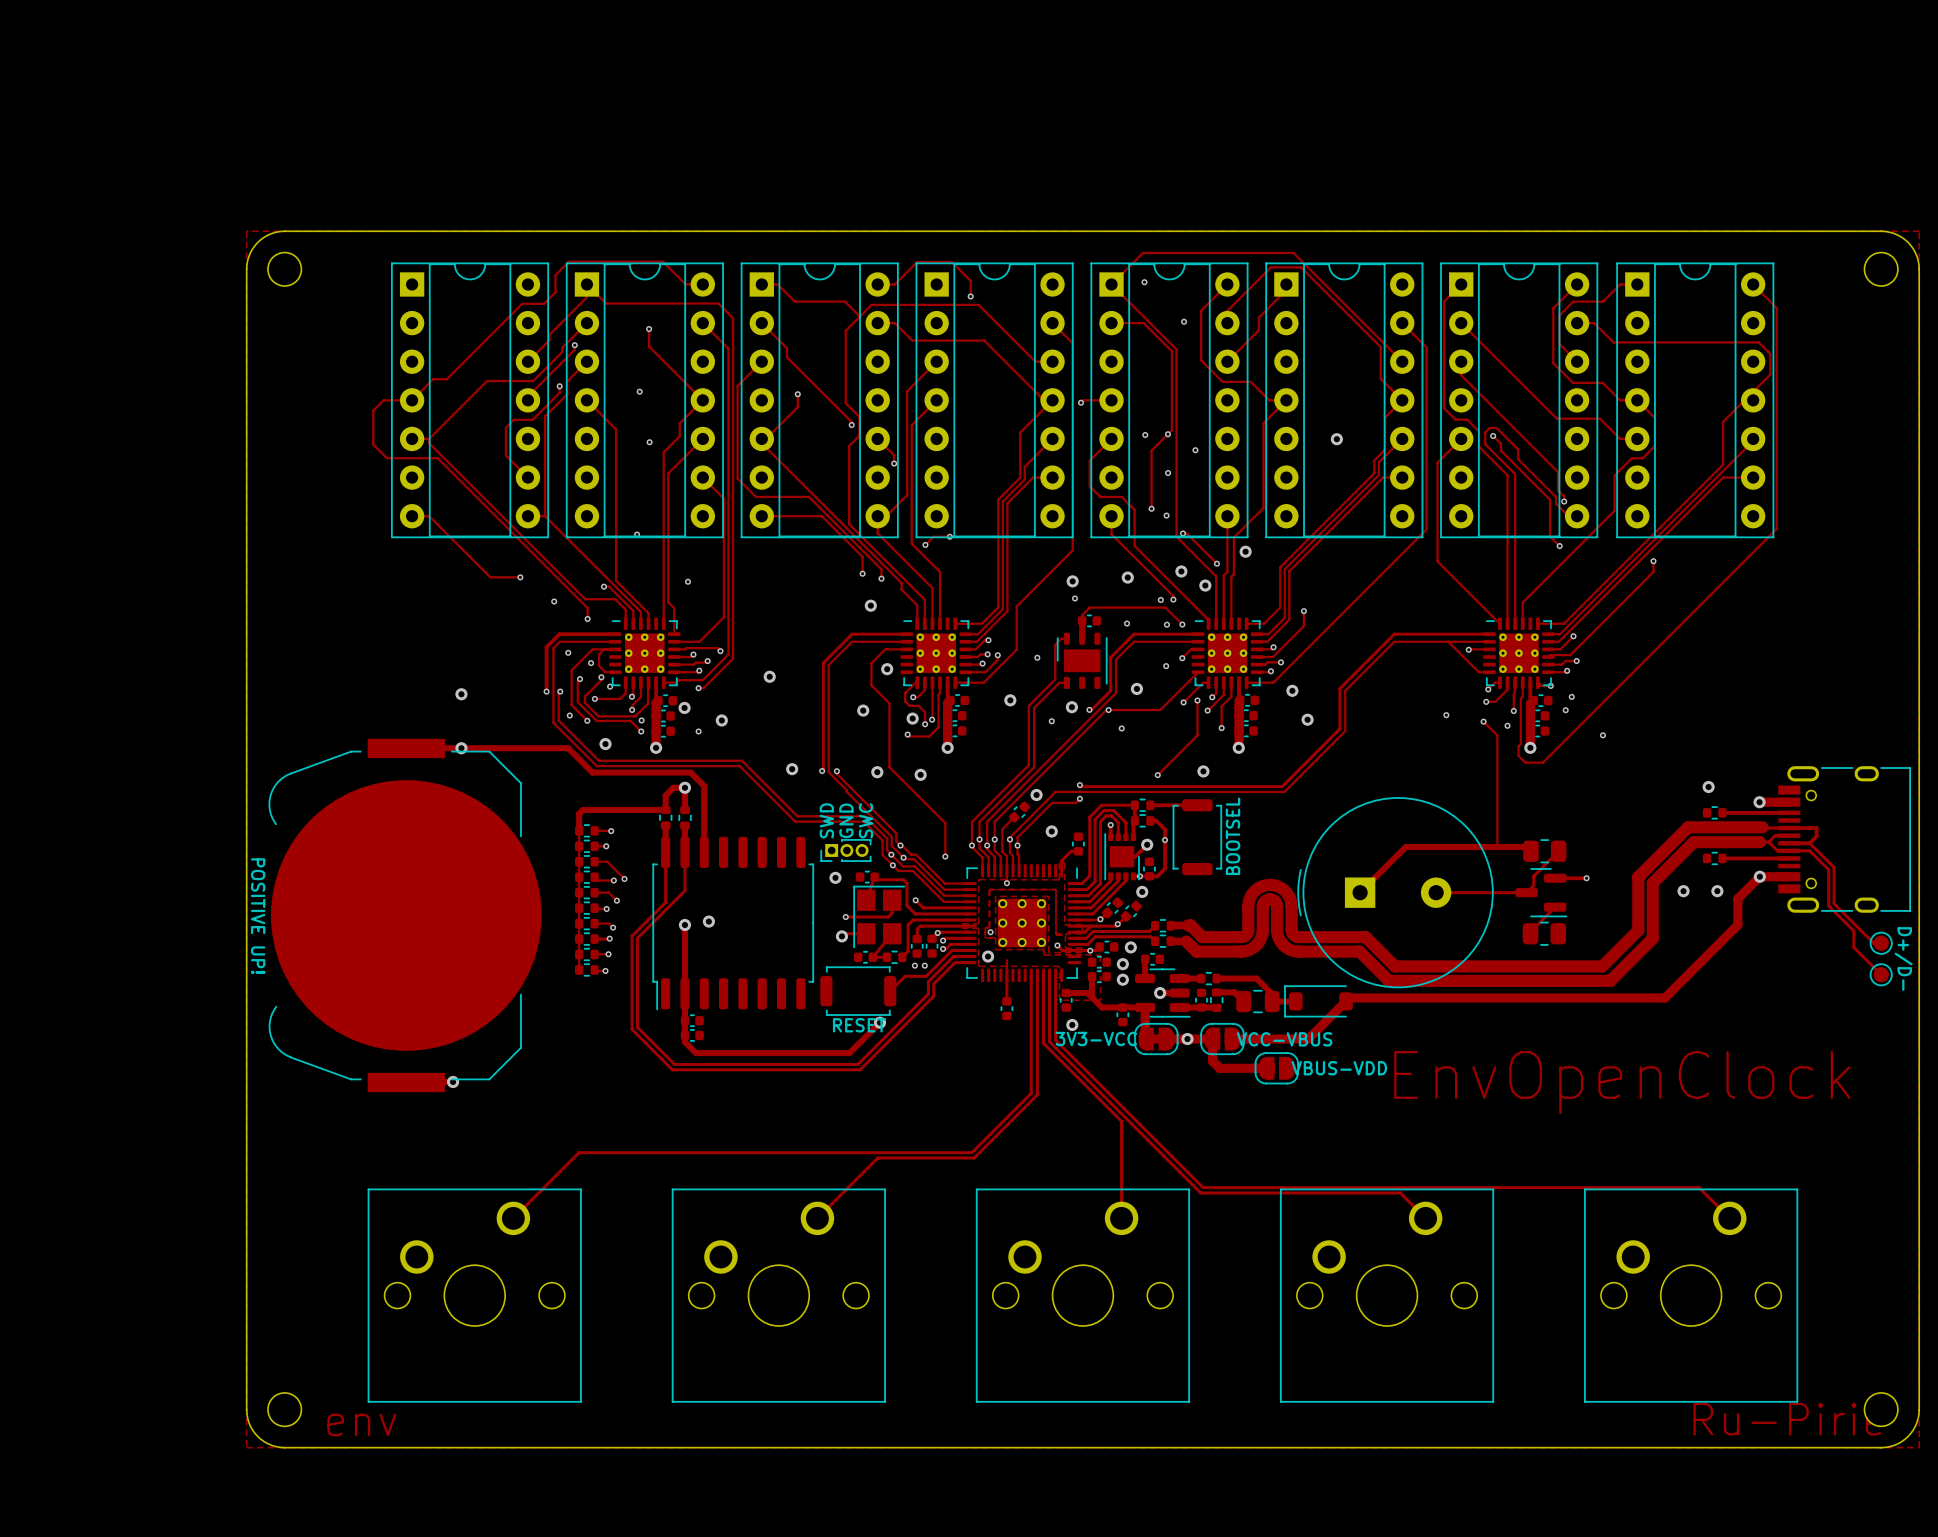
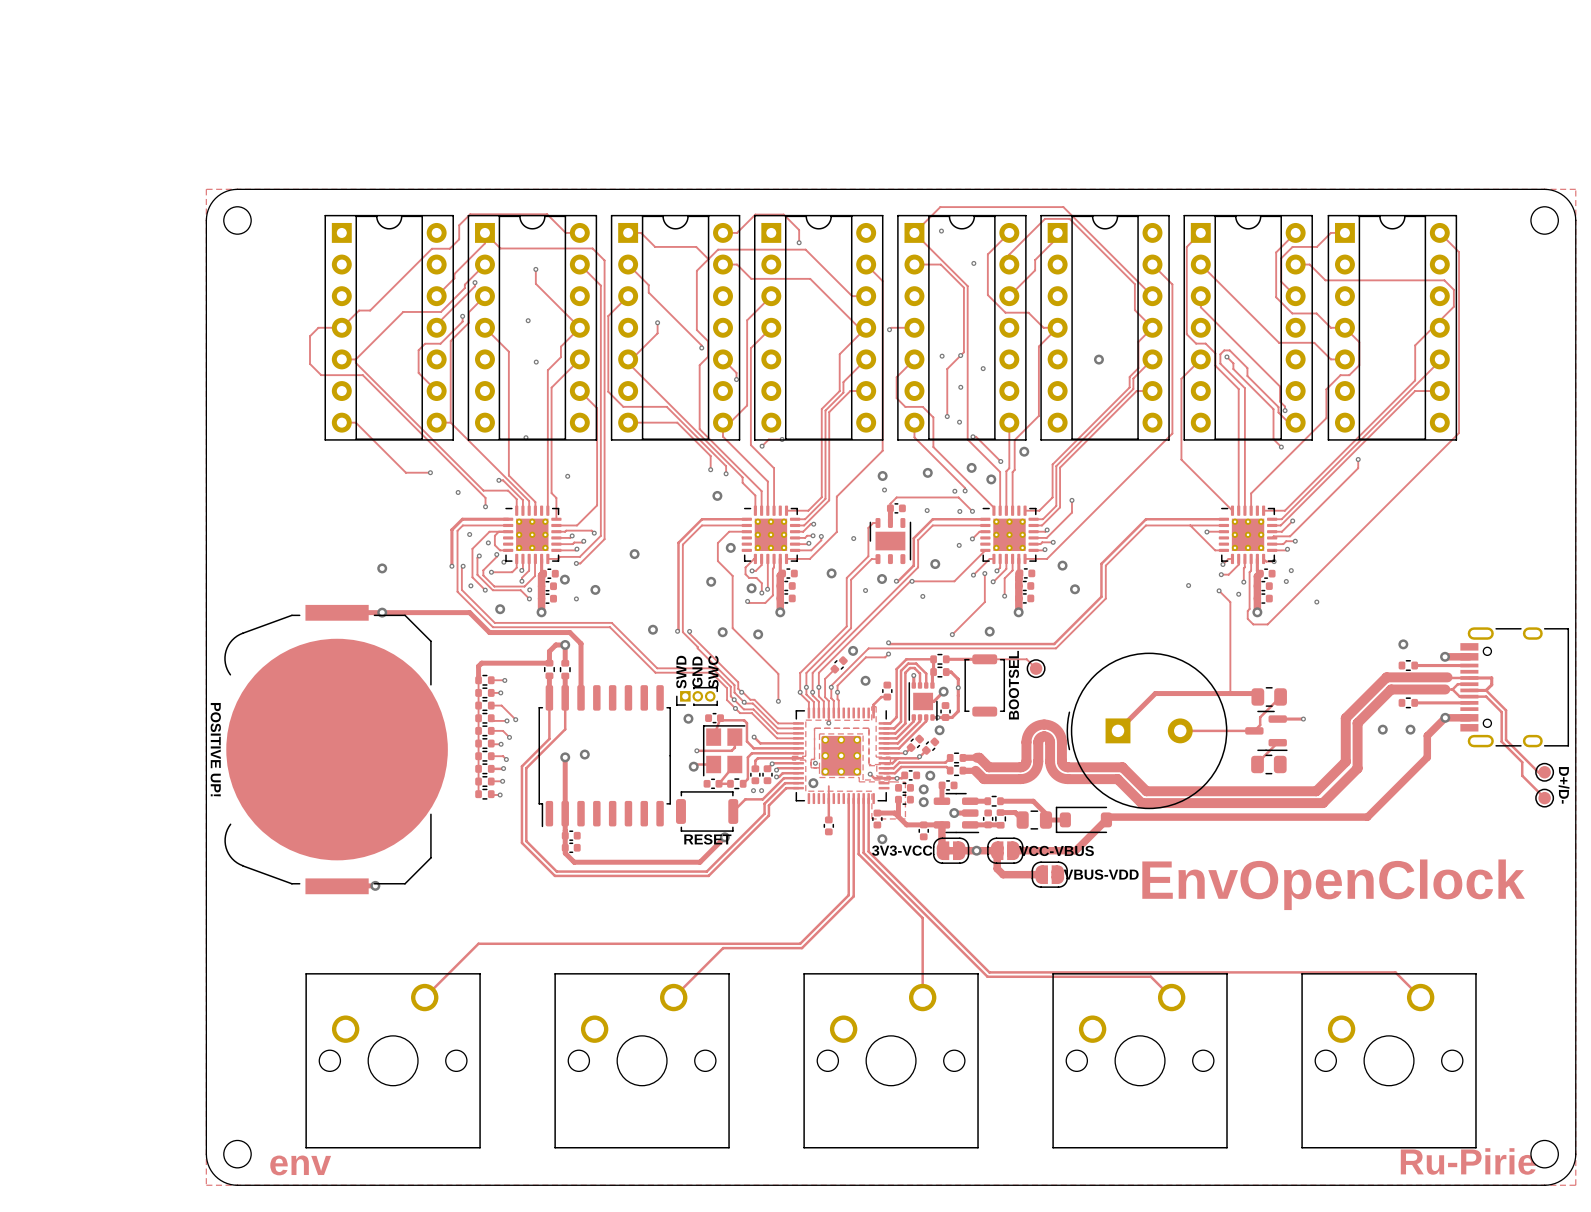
track: none -> (984, 659) (1026, 659) (1036, 668)
part: none -> (1036, 668)

